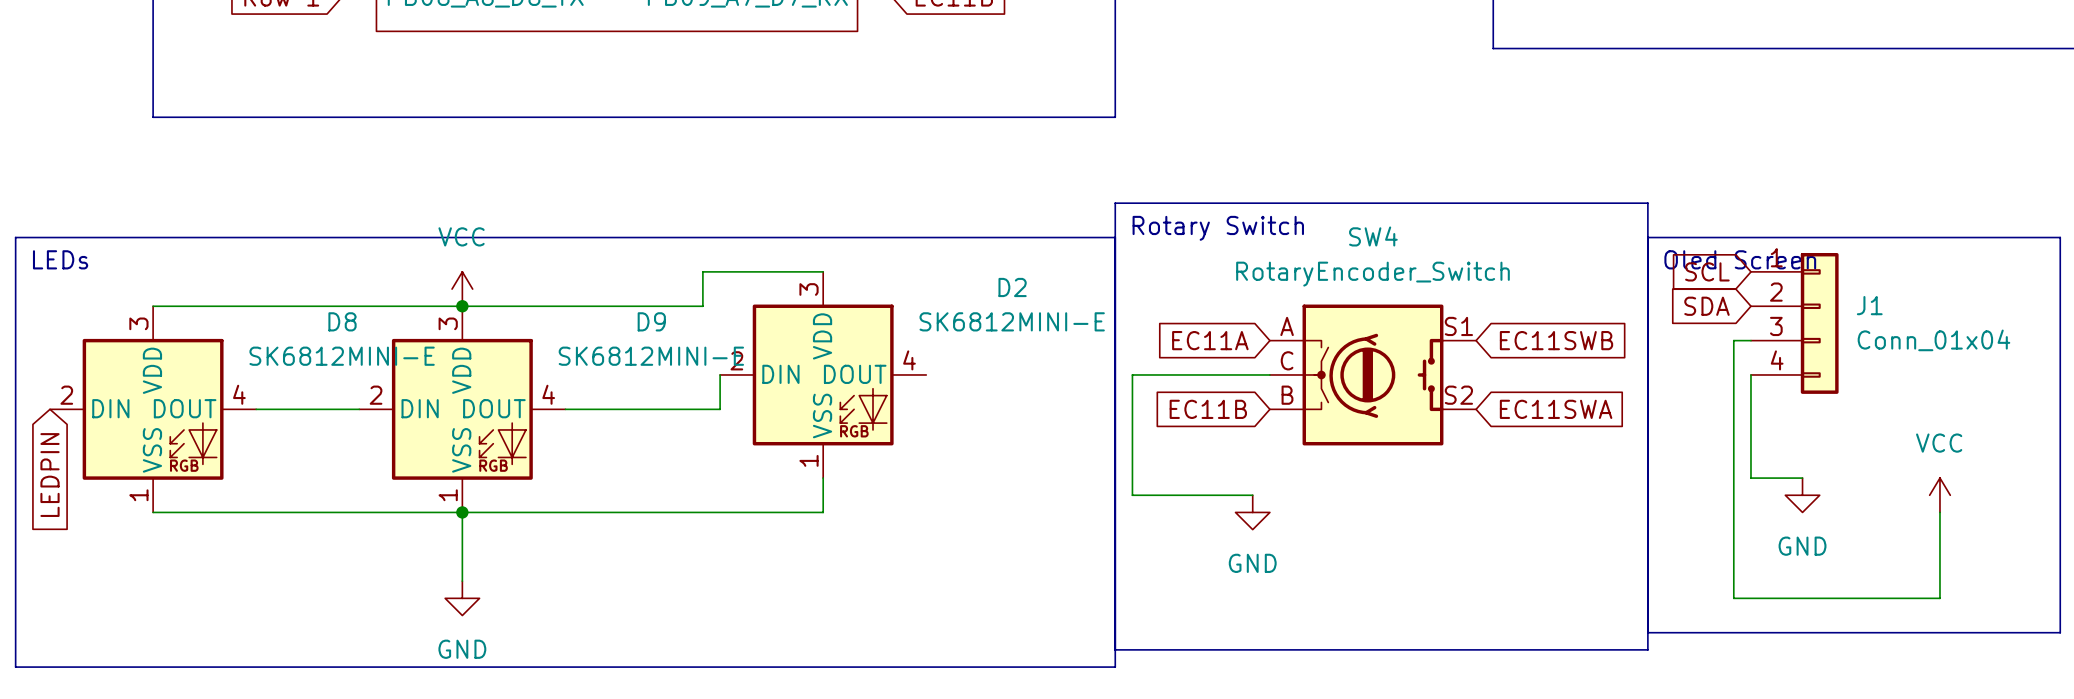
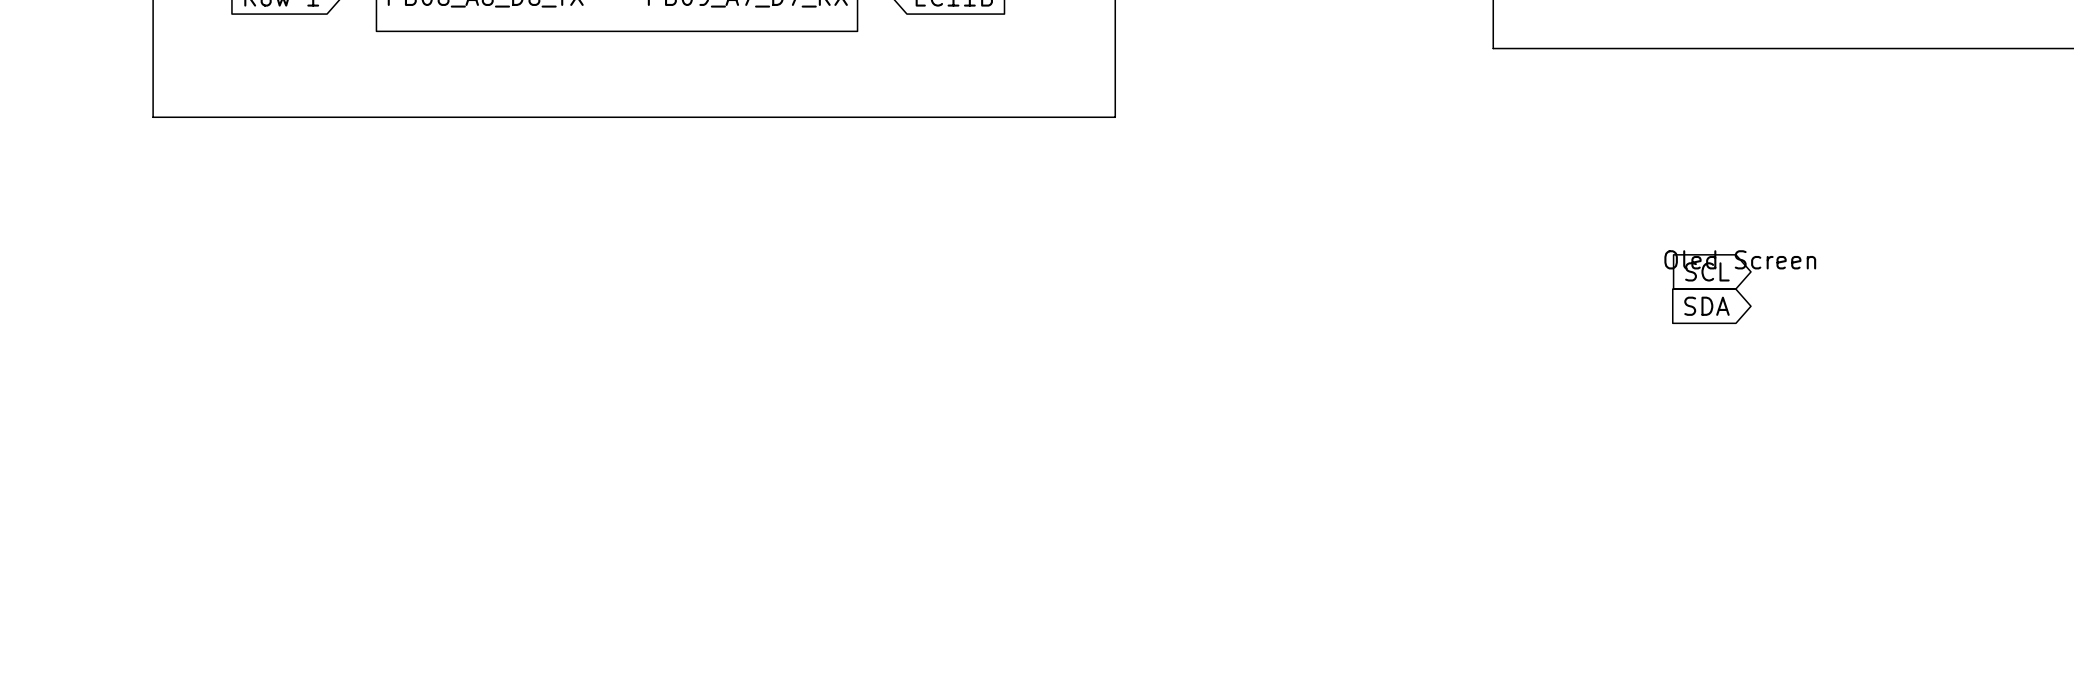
text: Rotary Switch (1218, 228) -> none
line: (1115, 237) (15, 237) (15, 667) (1115, 667) (1115, 203) (1647, 203) (1647, 649) (1115, 649) -> none
line: (1647, 237) (2060, 237) (2060, 632) (1647, 632) -> none
text: LEDs (60, 259) -> none
wire: (823, 271) (702, 271) (702, 306) (153, 306) -> none
power symbol: VCC (462, 289) -> none
junction: (462, 306) -> none
J1: Conn_01x04 (1794, 323) -> none
global label: EC11A (1210, 340) -> none
global label: EC11SWB (1556, 340) -> none
wire: (1750, 340) (1733, 340) (1733, 598) (1939, 598) (1939, 512) -> none
wire: (720, 374) (720, 409) (565, 409) -> none
D2: SK6812MINI-E (823, 374) -> none
wire: (1269, 374) (1132, 374) (1132, 495) (1252, 495) -> none
SW4: RotaryEncoder_Switch (1372, 374) -> none
wire: (1750, 374) (1750, 478) (1802, 478) -> none
D8: SK6812MINI-E (153, 409) -> none
wire: (256, 409) (359, 409) -> none
D9: SK6812MINI-E (462, 409) -> none
global label: EC11B (1208, 409) -> none
global label: EC11SWA (1556, 409) -> none
global label: LEDPIN (50, 475) -> none
wire: (823, 478) (823, 512) (153, 512) -> none
power symbol: GND (1802, 495) -> none
power symbol: VCC (1939, 495) -> none
wire: (462, 512) (462, 581) -> none
junction: (462, 512) -> none
power symbol: GND (1252, 512) -> none
power symbol: GND (462, 598) -> none

